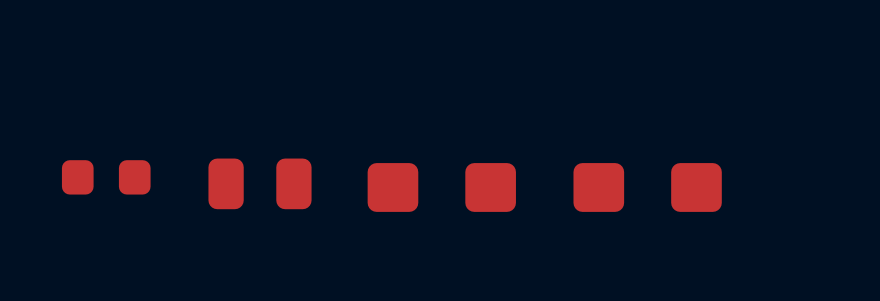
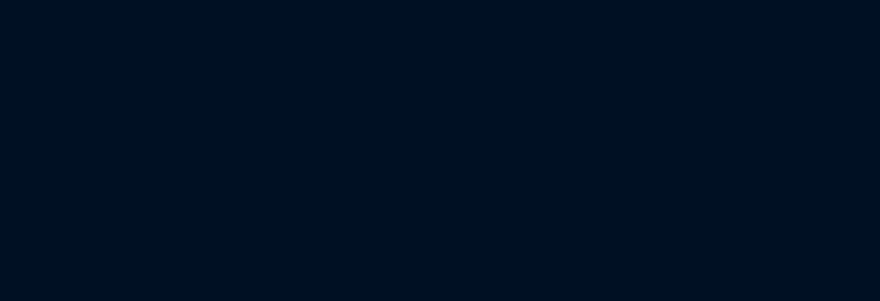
part: (106, 177) -> none
part: (260, 183) -> none
part: (441, 187) -> none
part: (647, 187) -> none

